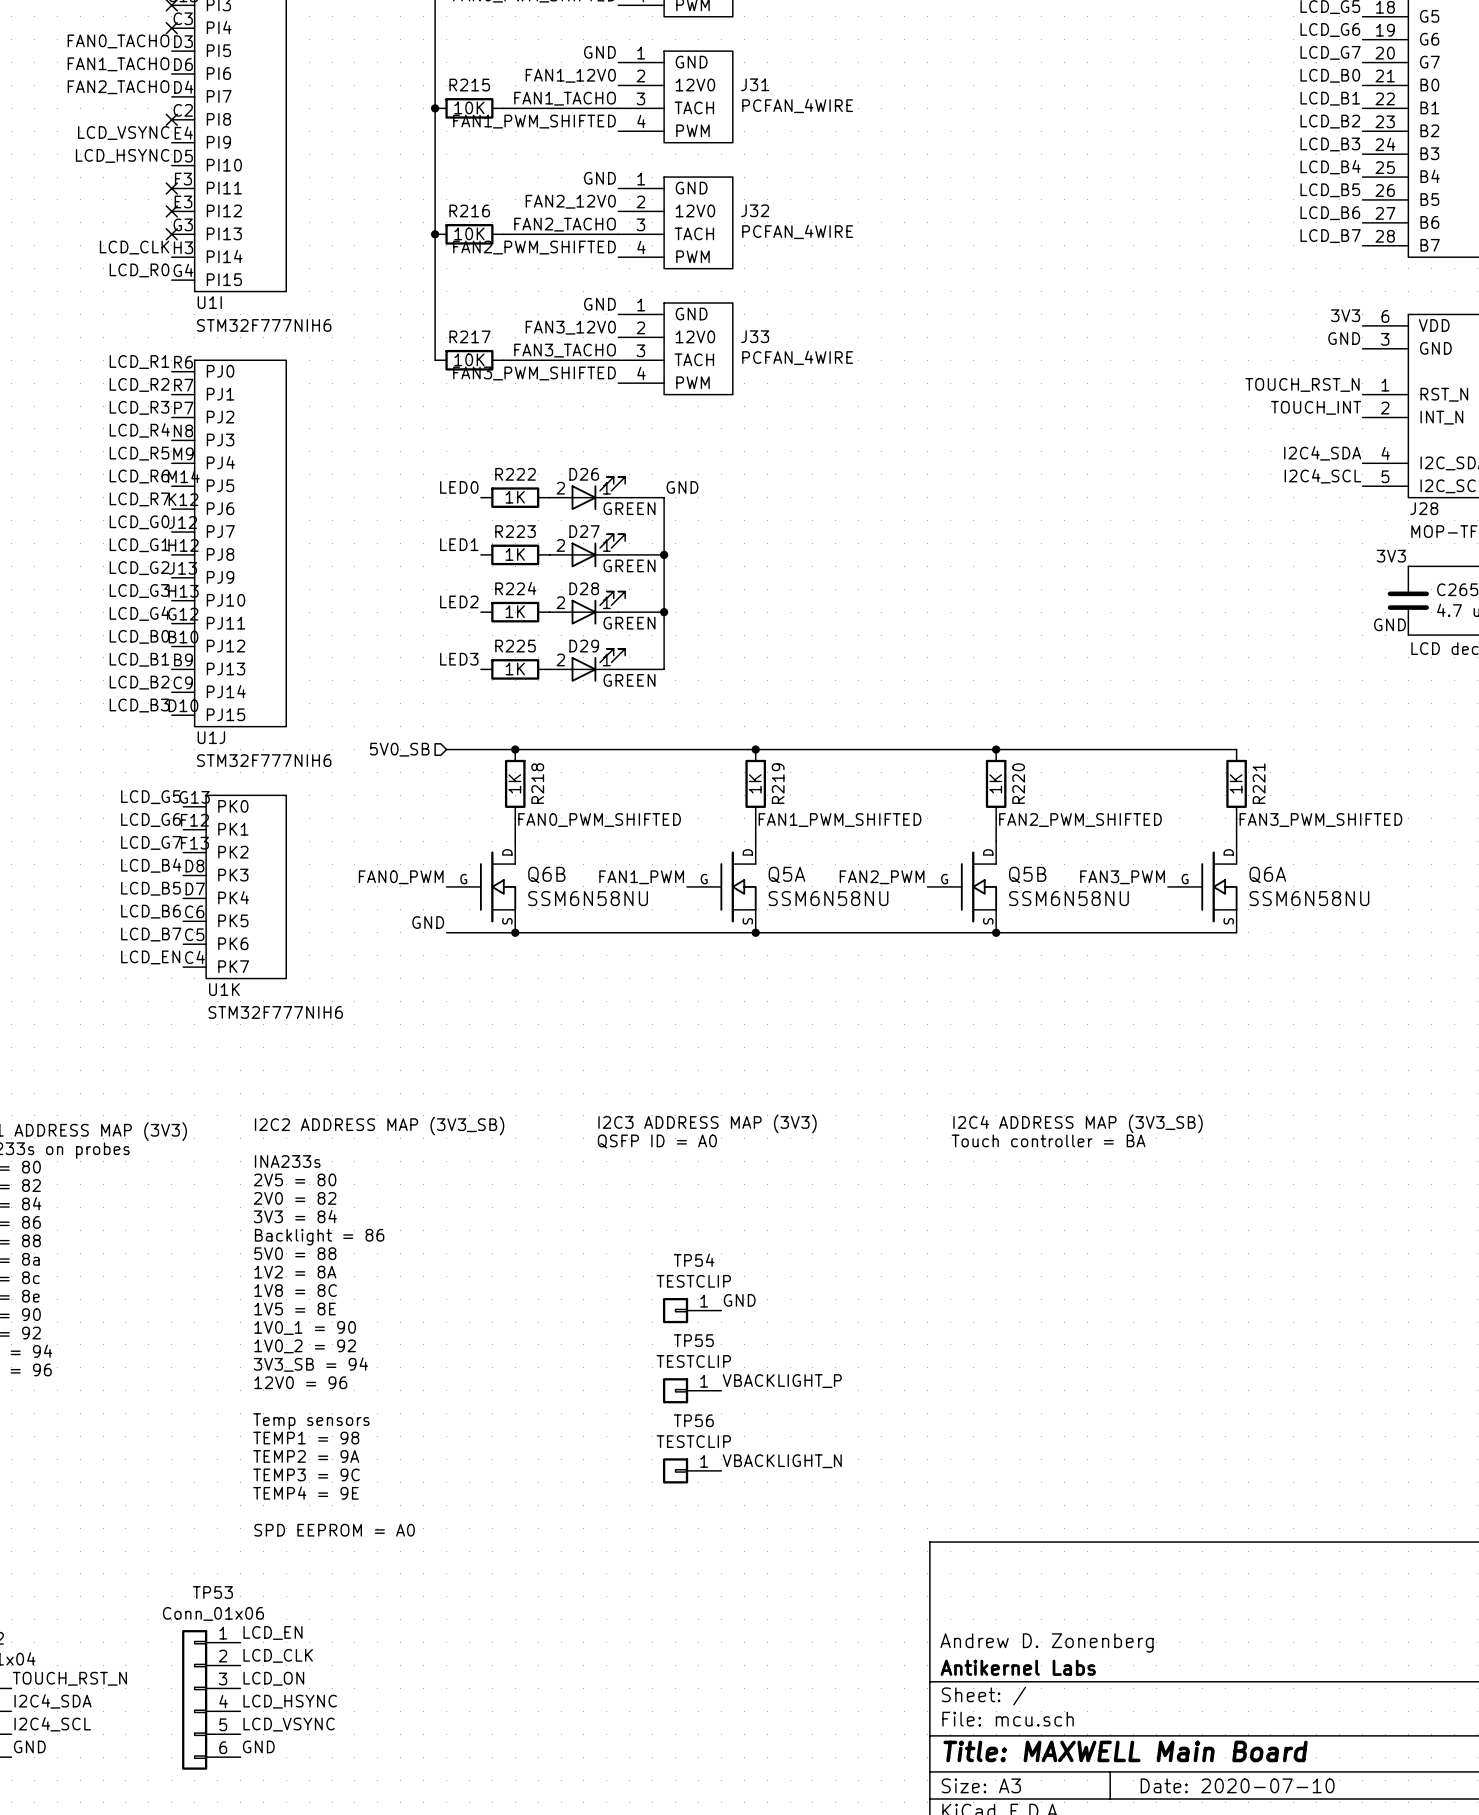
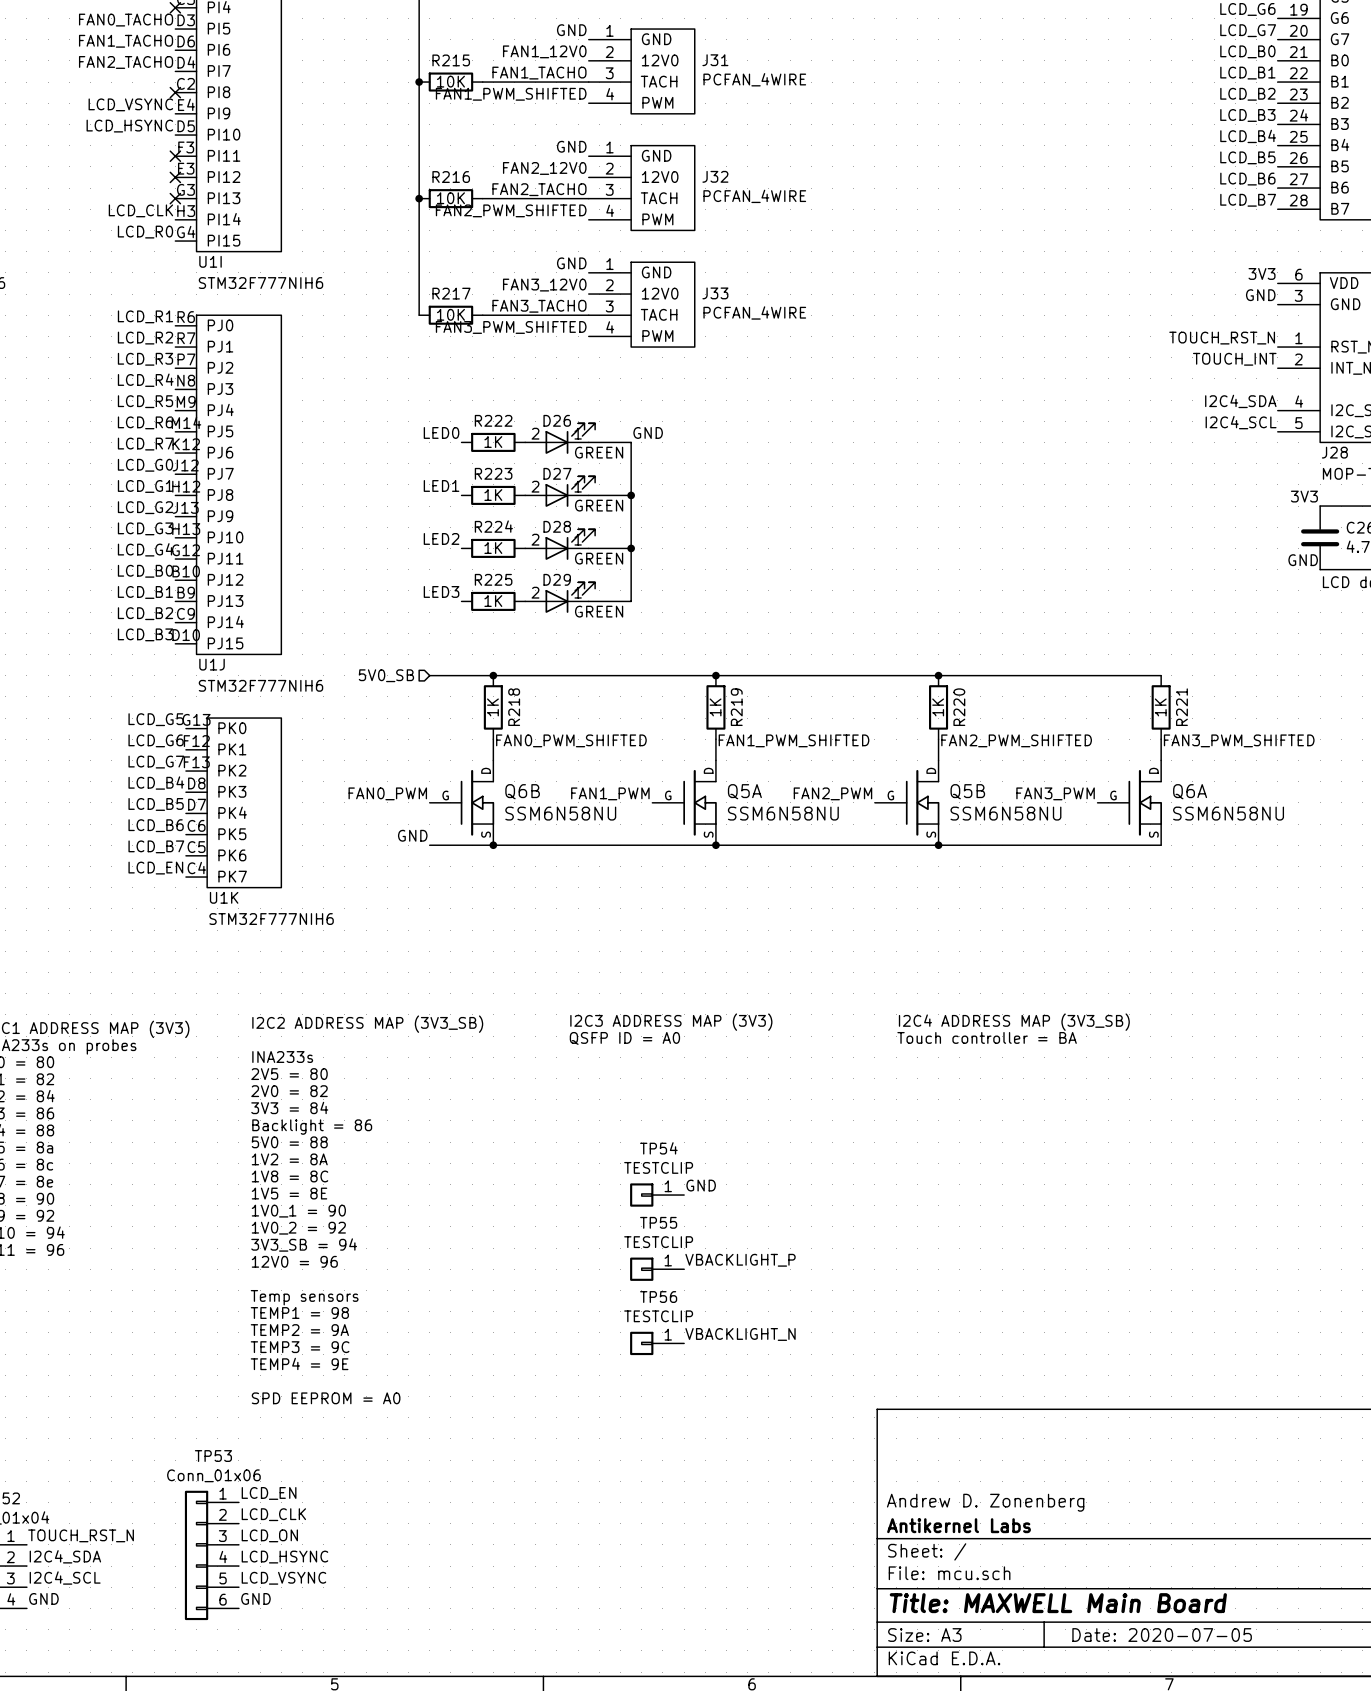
title block: Date: 2020-07-10 (1237, 1785) -> Date: 2020-07-05 (1162, 1635)

